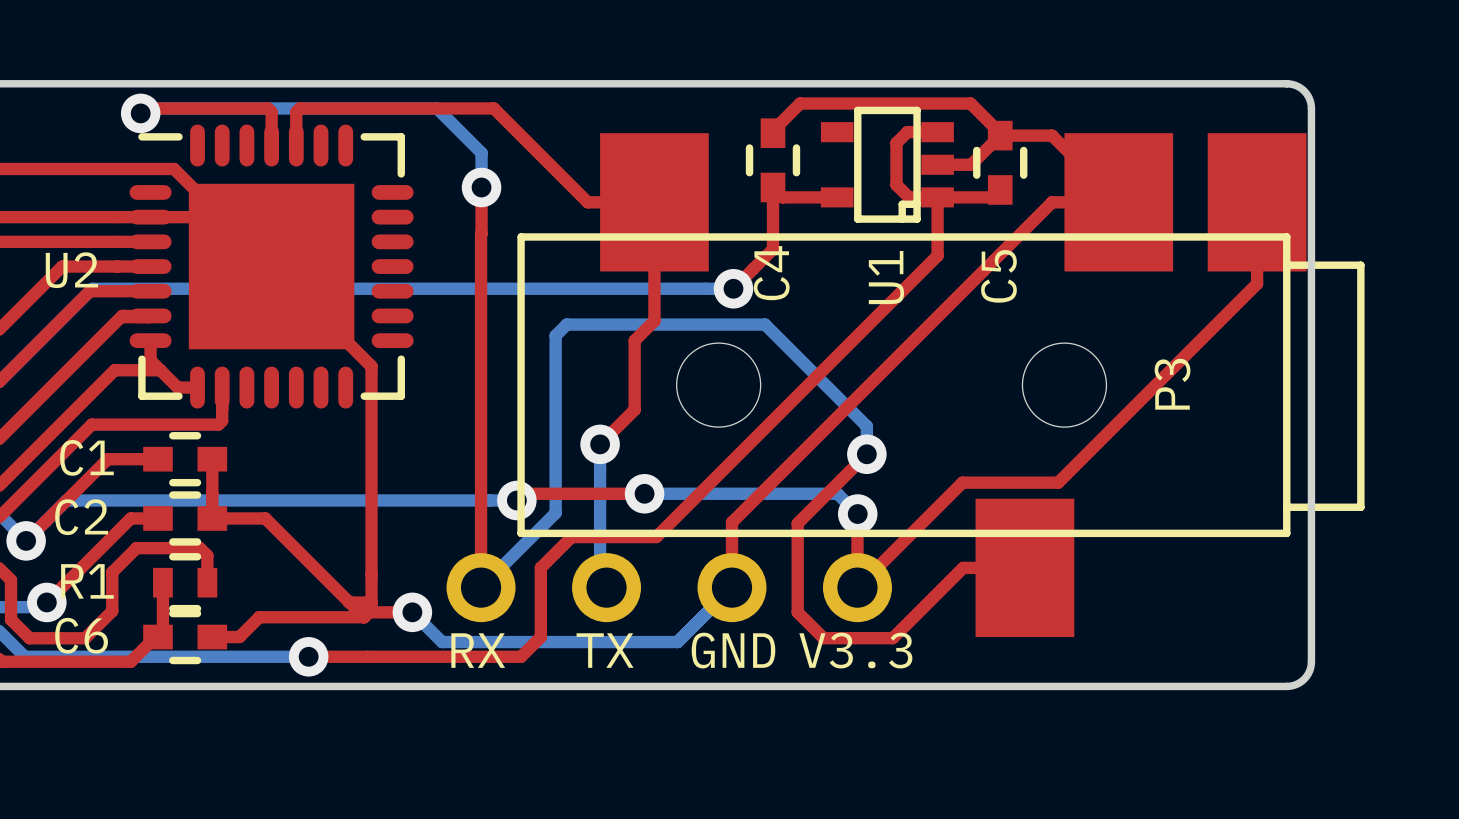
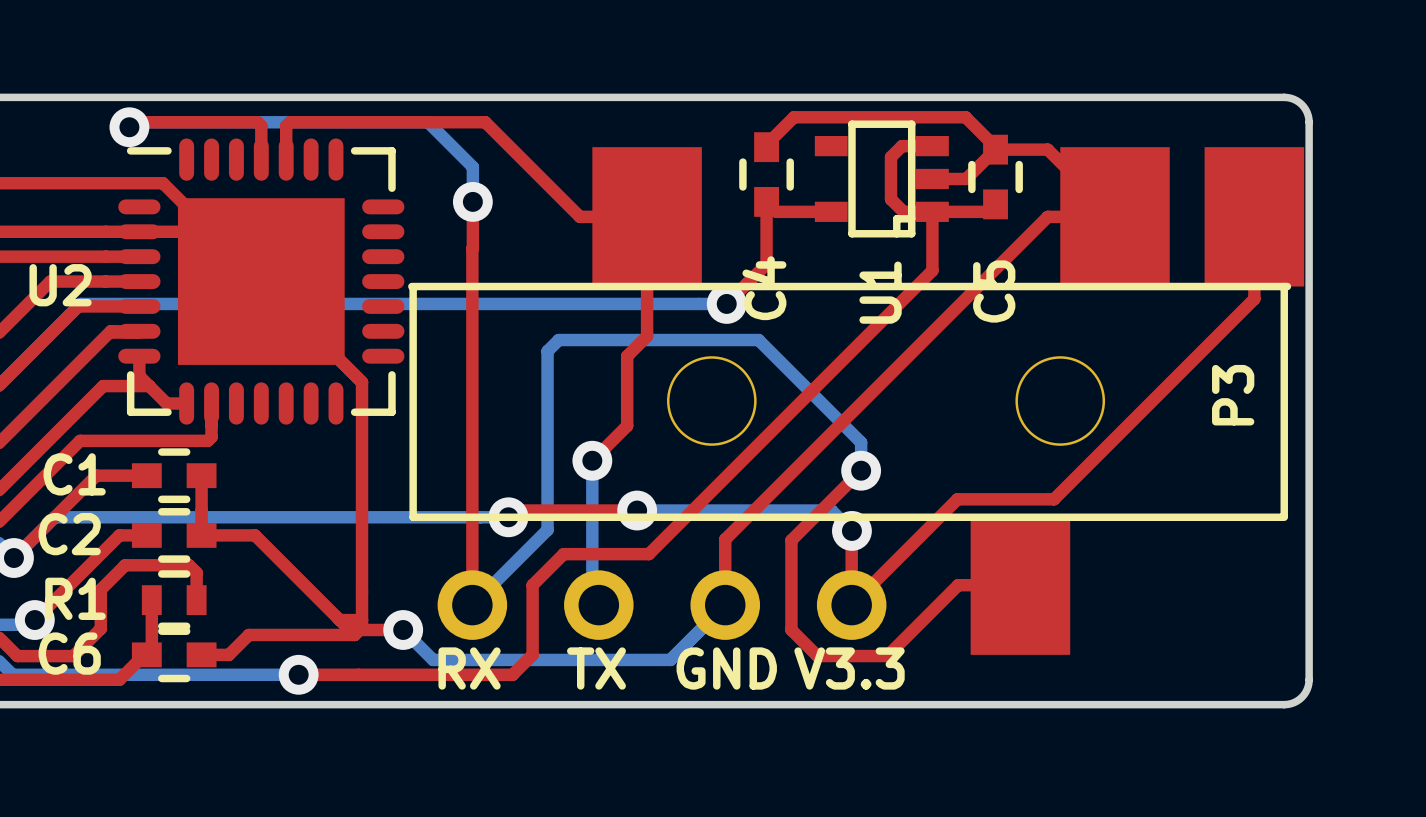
P3 footprint: [517, 133, 1365, 638] -> [408, 147, 1305, 655]
P3 name position: P3 (1172, 384) -> P3 (1233, 395)

